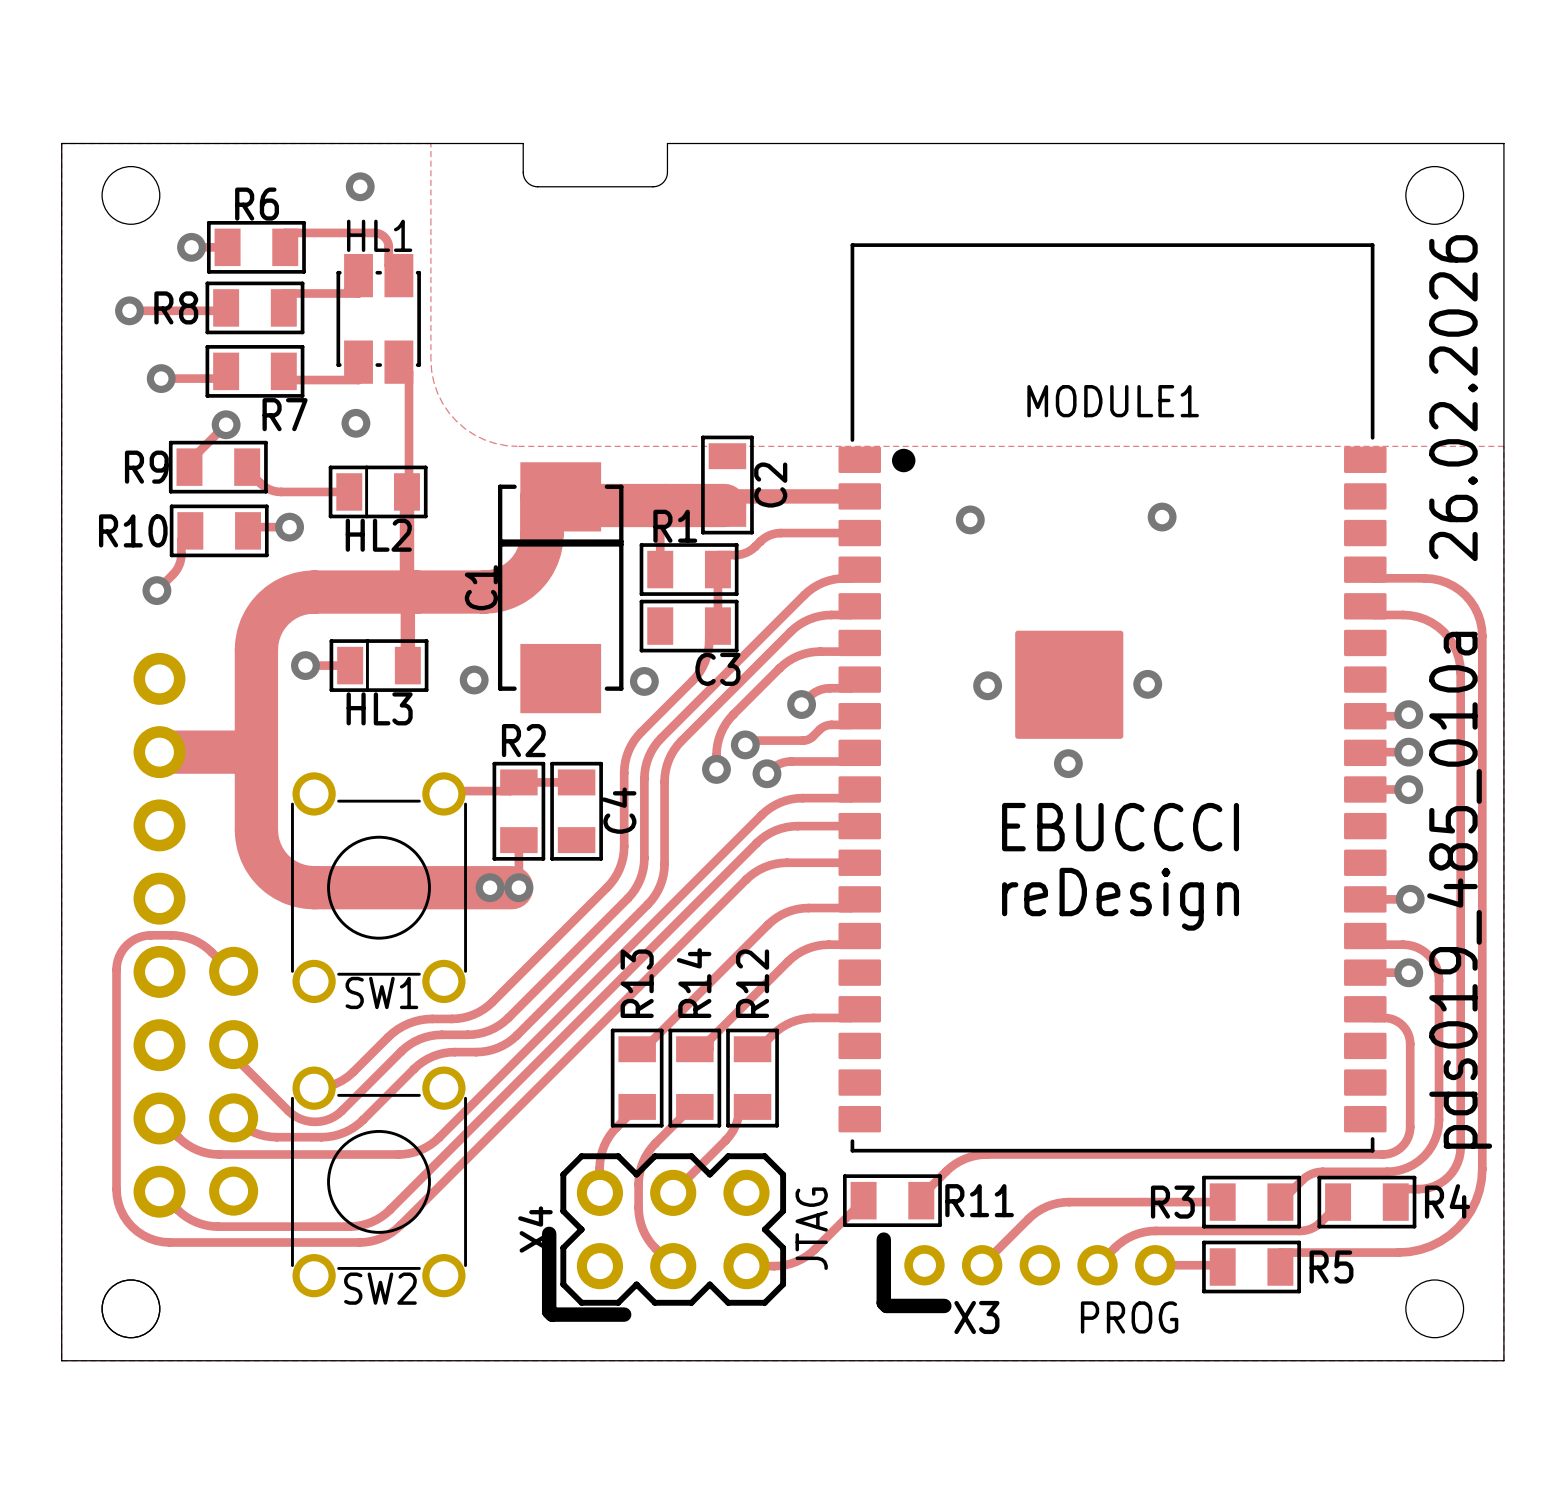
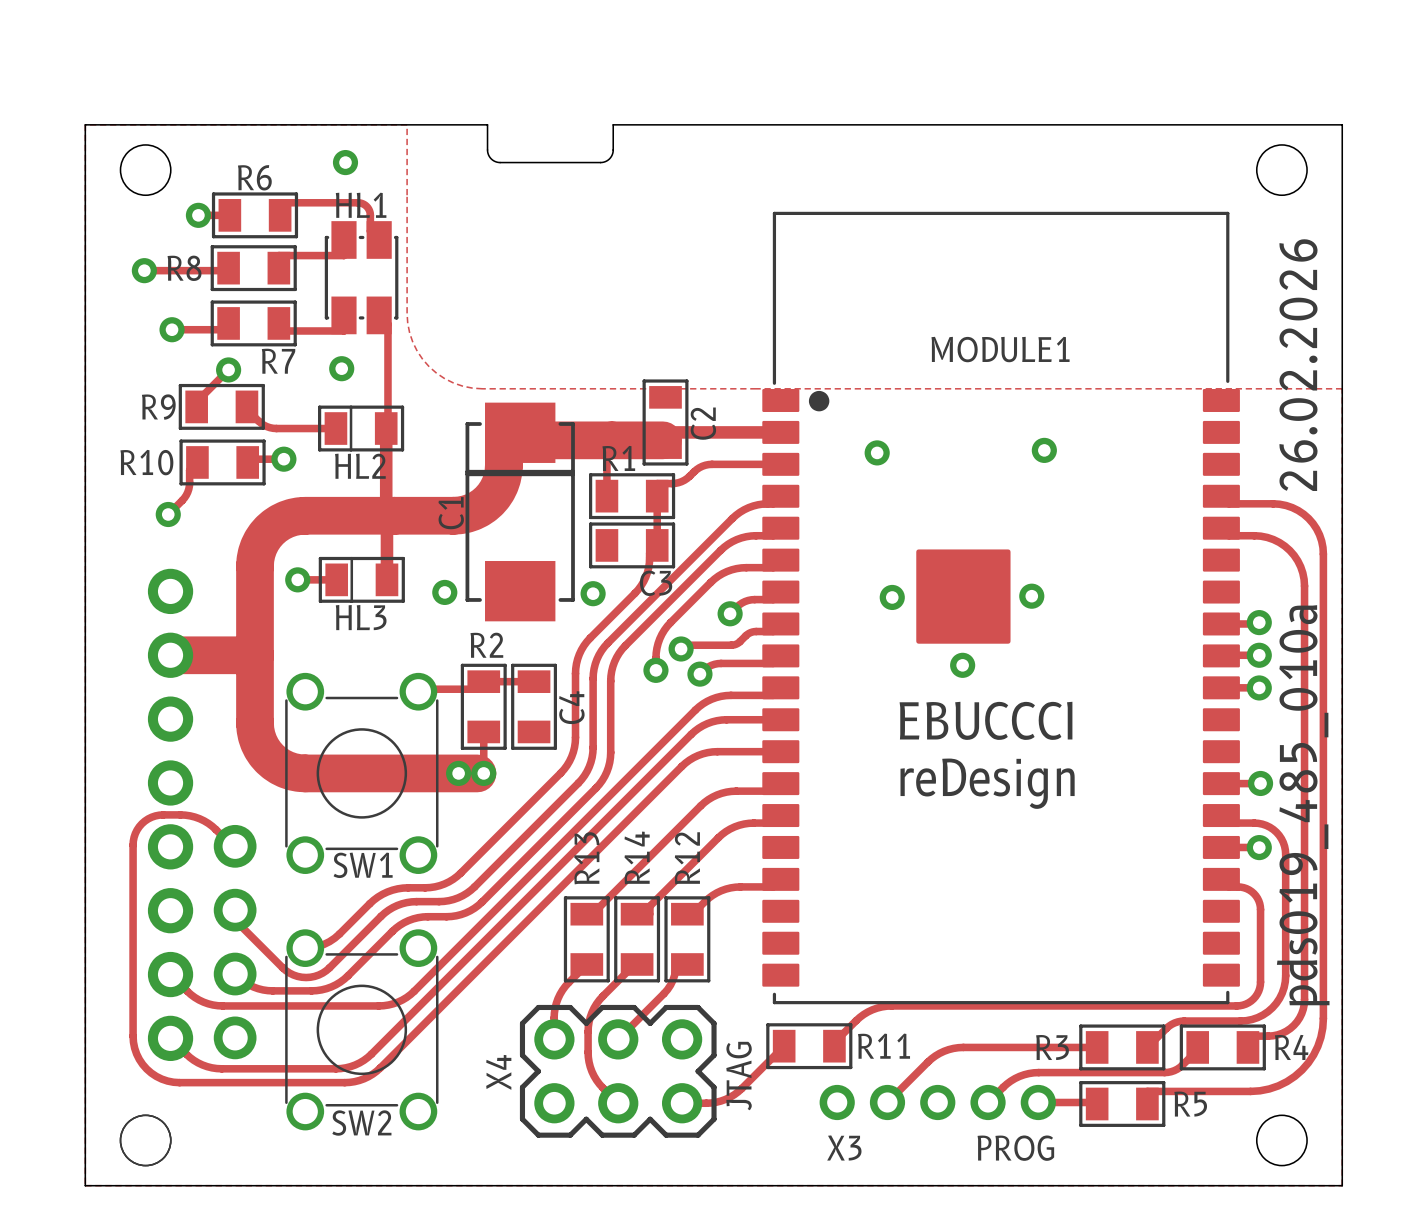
line: (549, 1233) (549, 1311) (552, 1314) (624, 1314) -> none
line: (883, 1239) (883, 1303) (886, 1305) (944, 1305) -> none
X3 name position: X3 (976, 1317) -> X3 (844, 1147)

